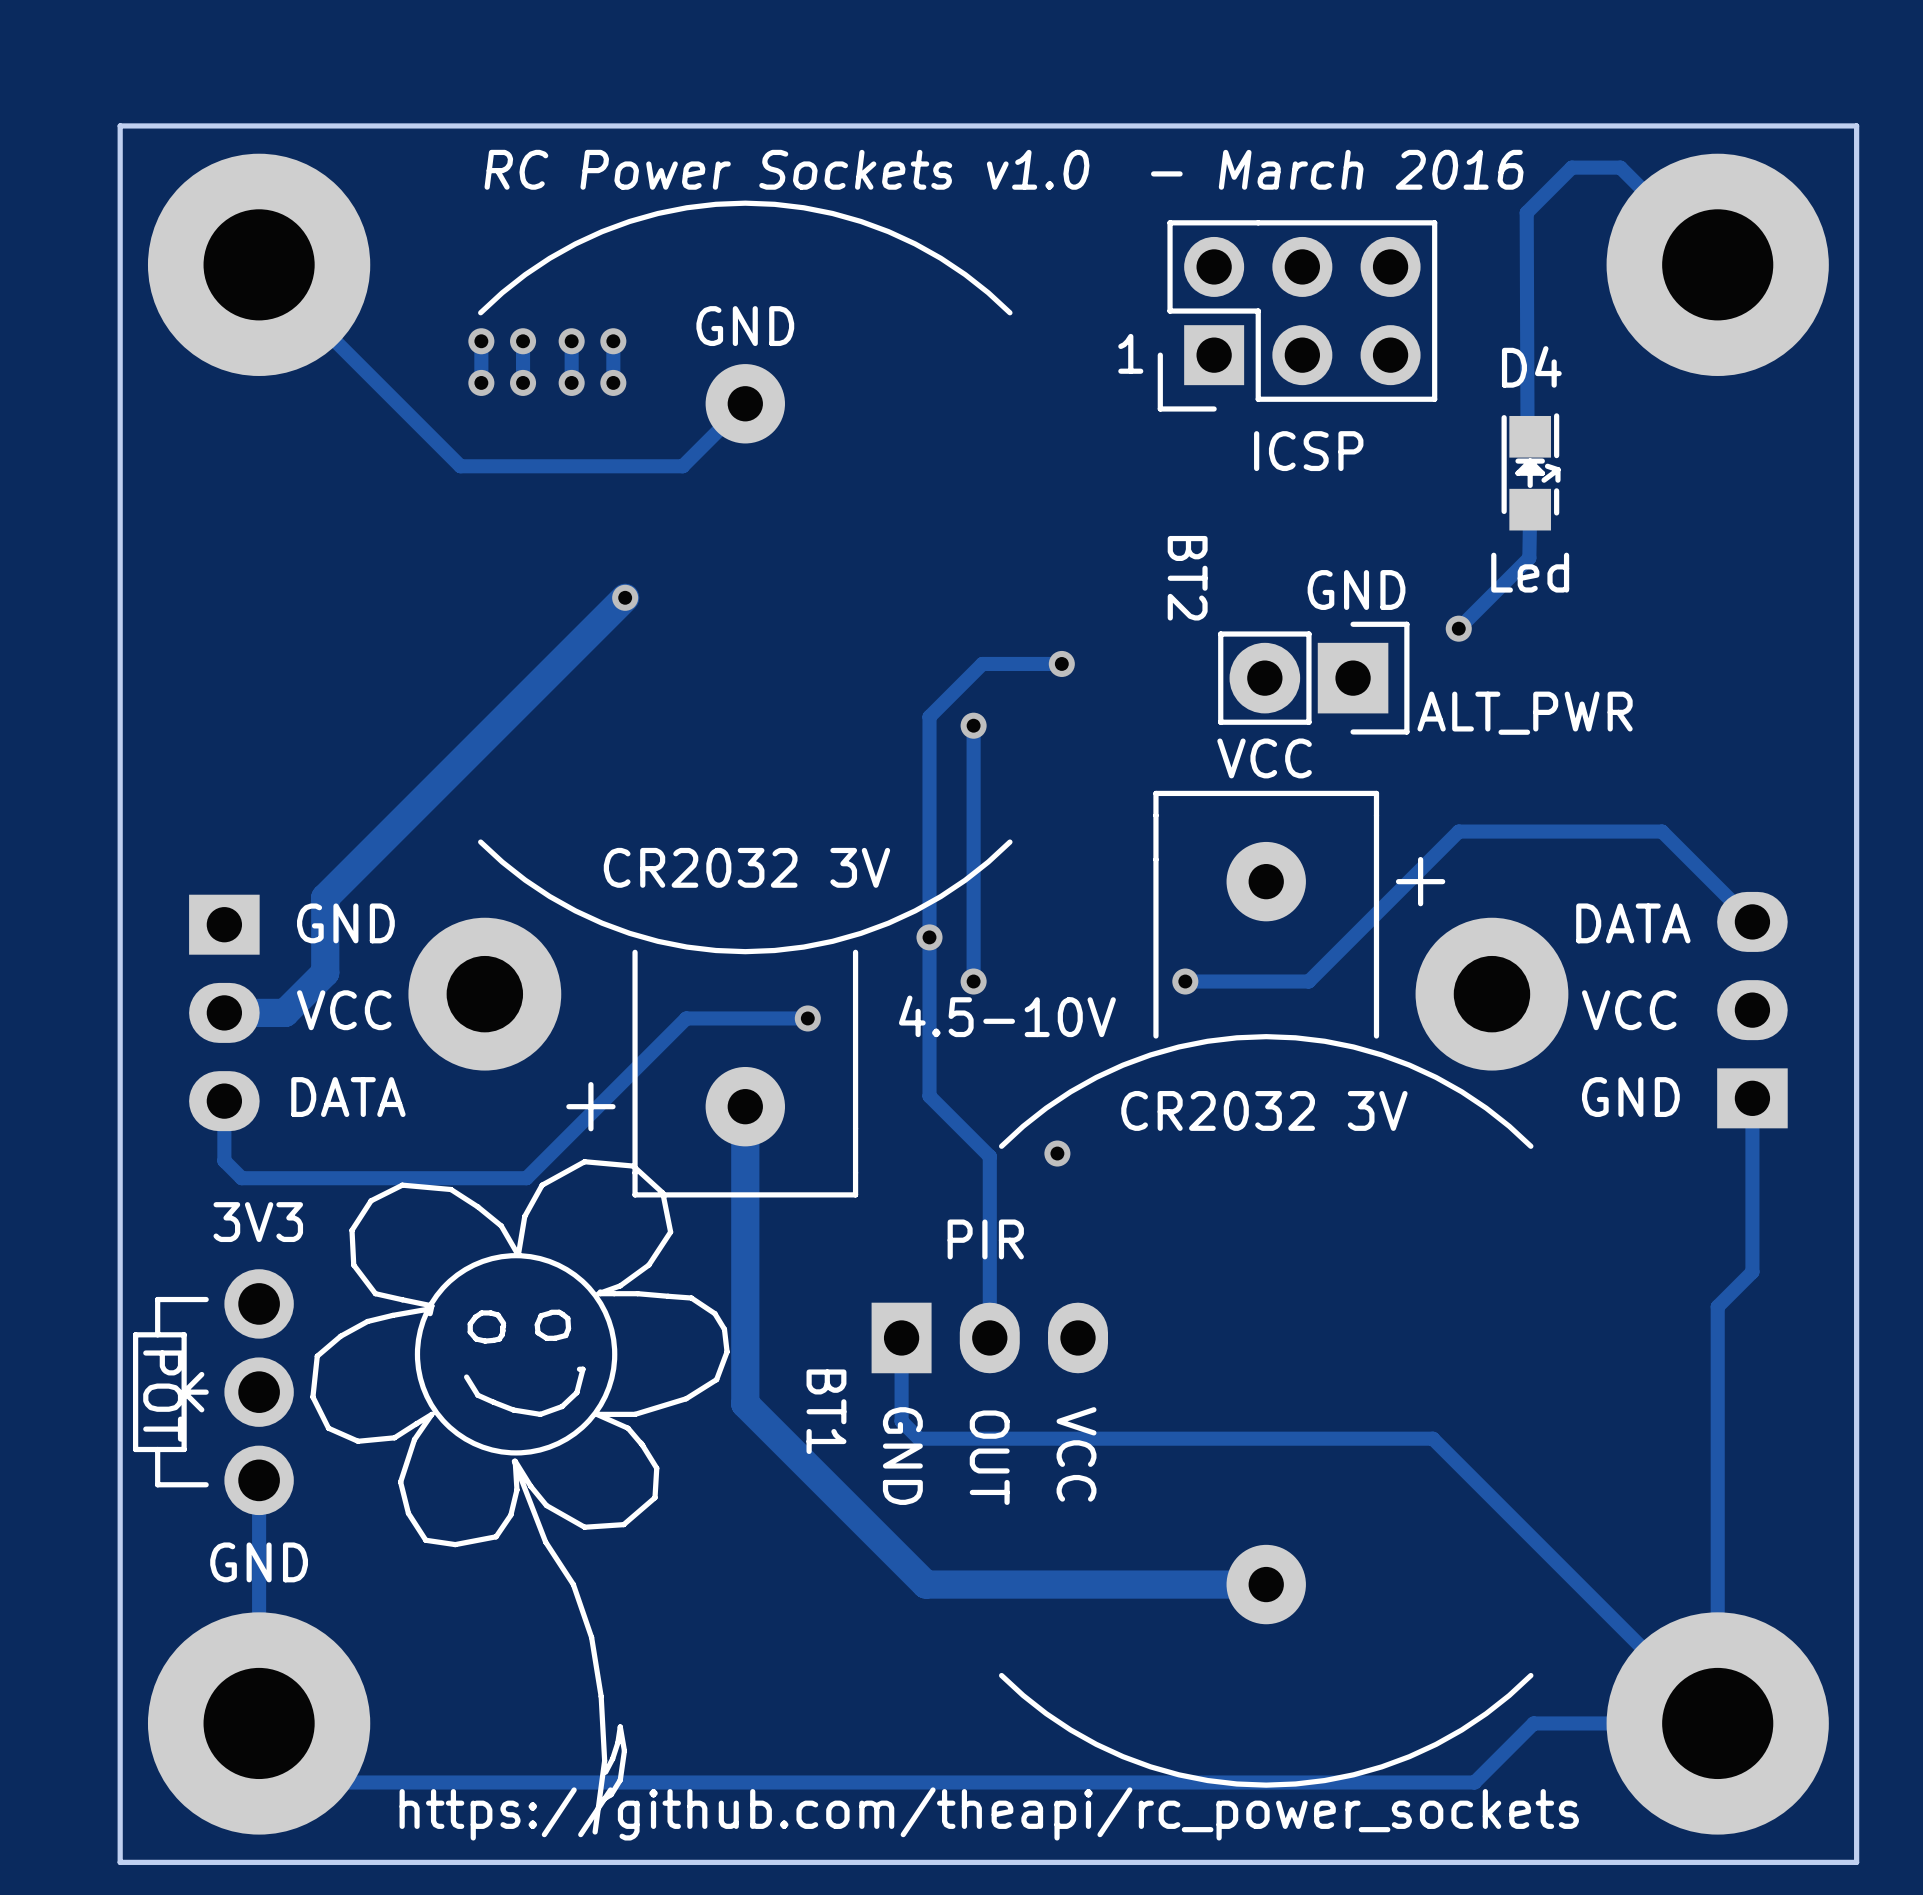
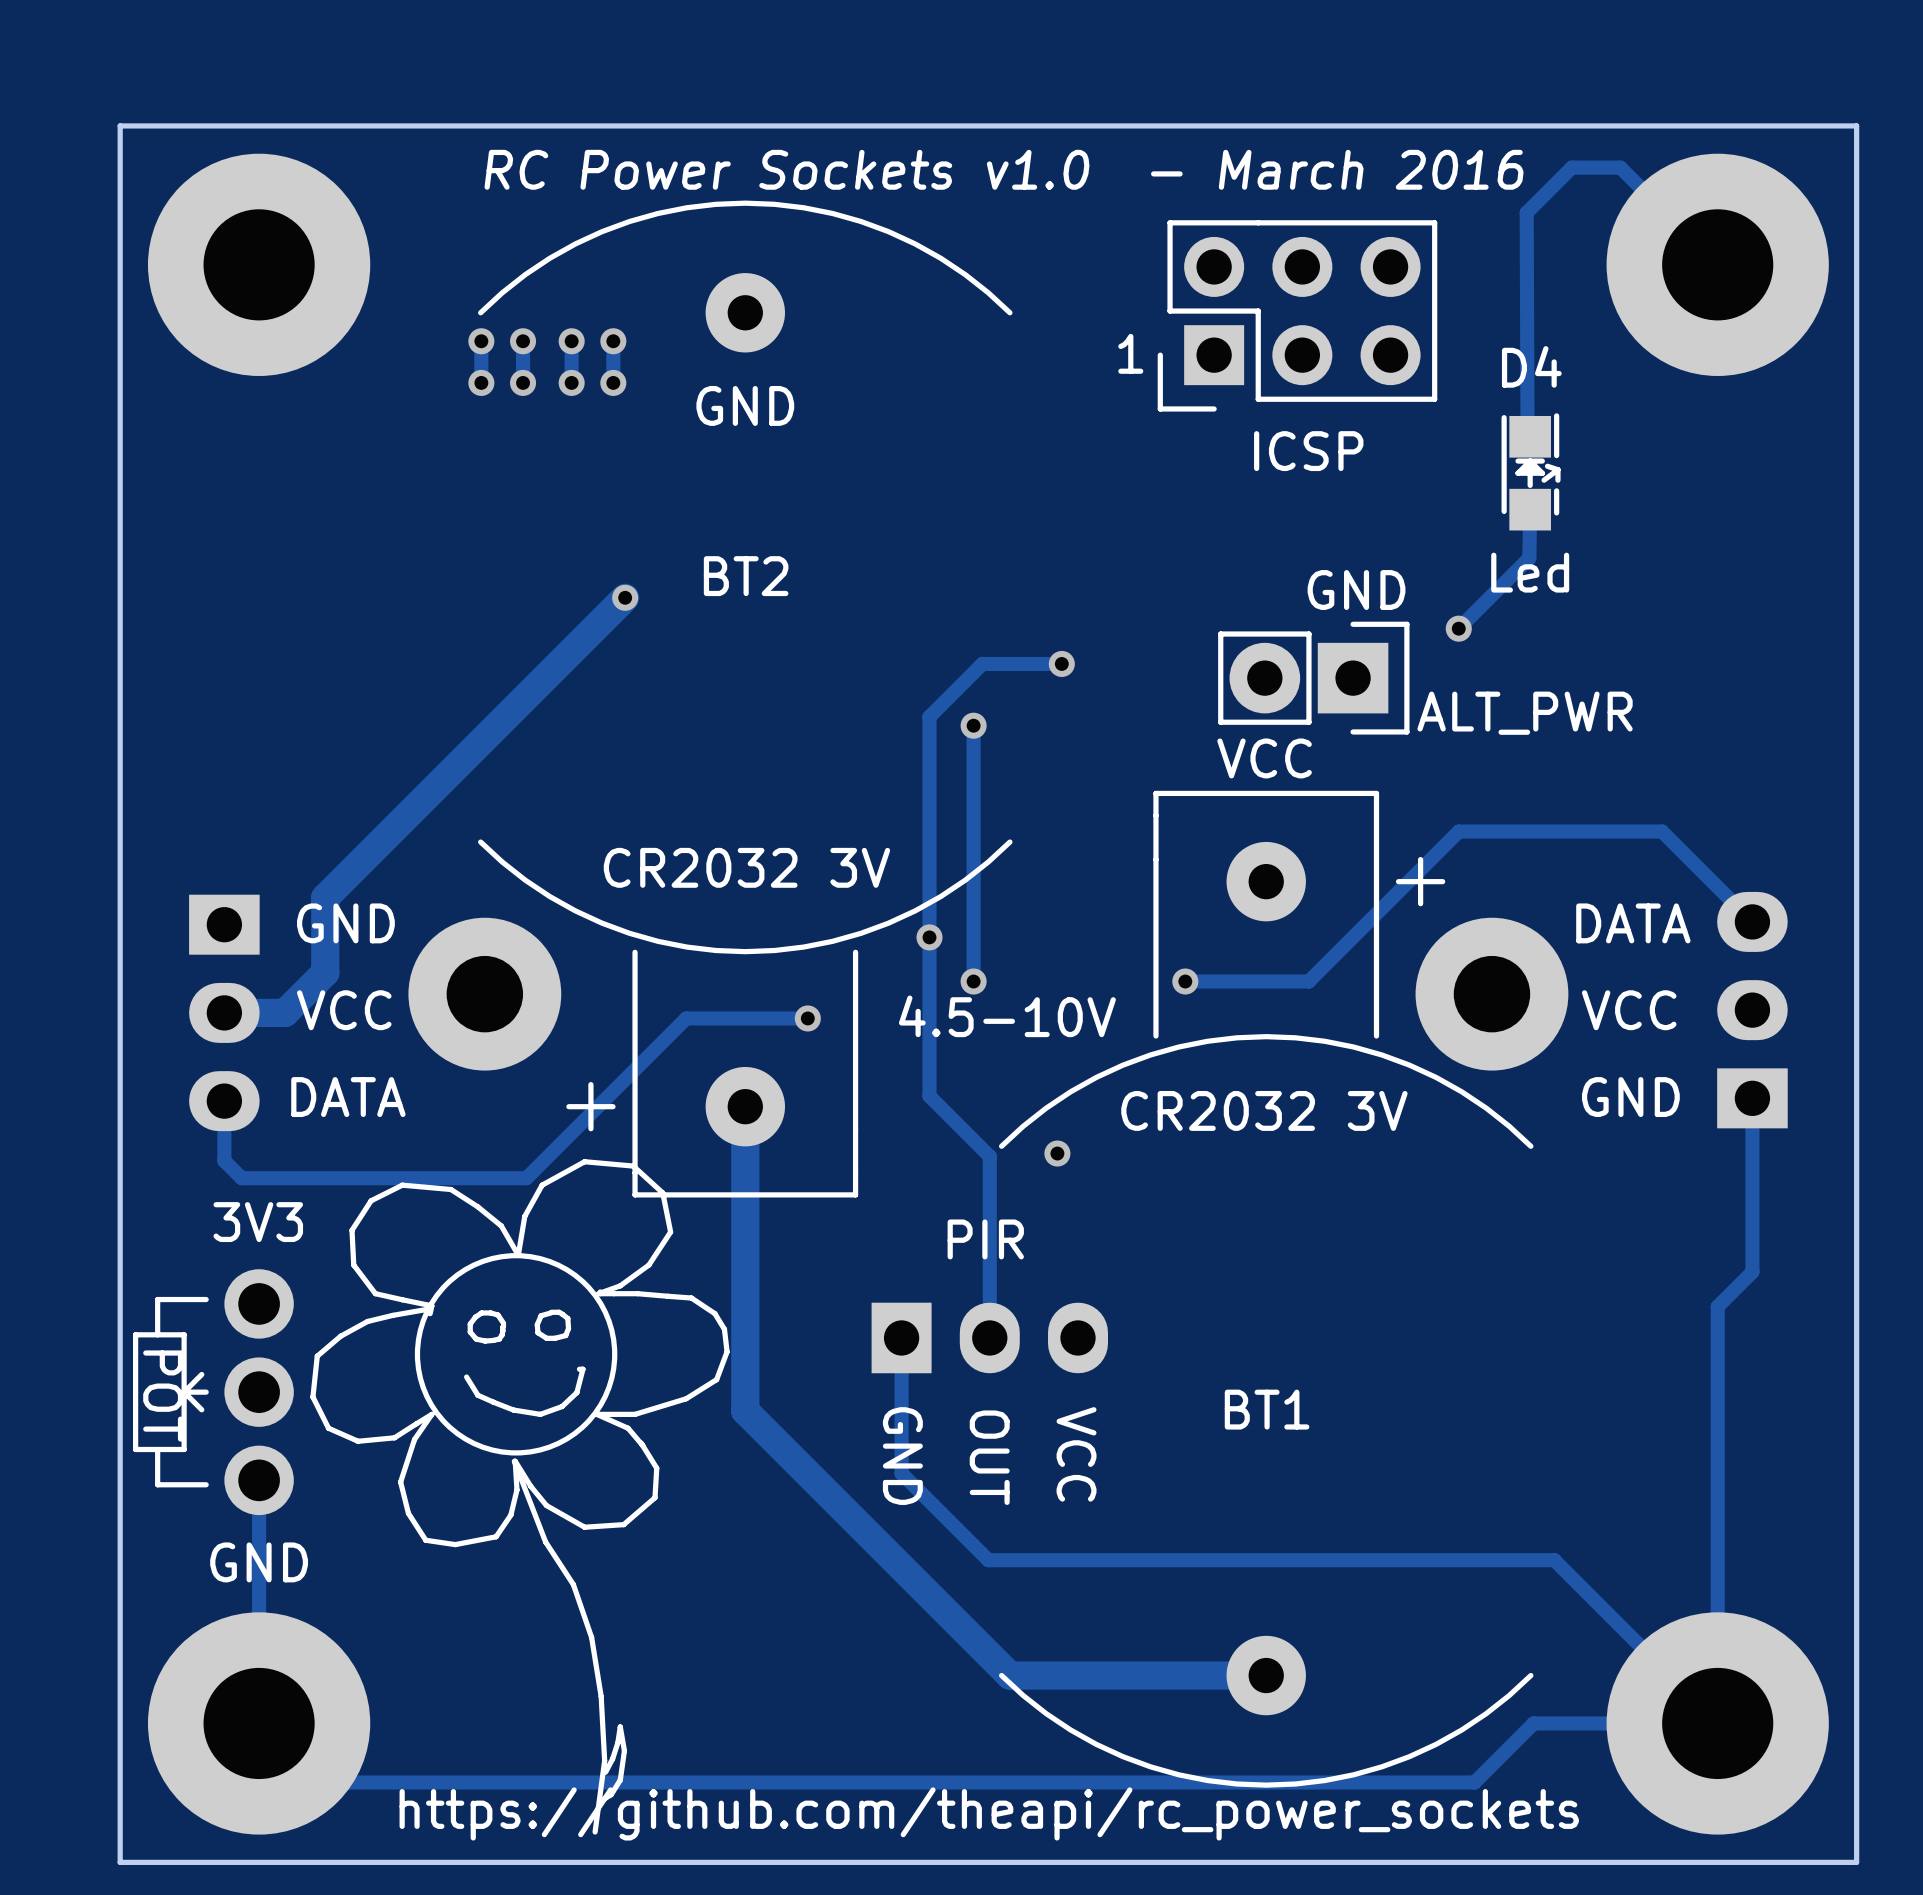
BT2 footprint: [478, 200, 1013, 1198] -> [478, 200, 1013, 1198]
track: (307, 312) (460, 466) (682, 466) (745, 403) -> none
text position: GND (745, 326) -> GND (745, 405)
BT2 name position: BT2 (1187, 578) -> BT2 (746, 576)
BT1 footprint: [998, 790, 1534, 1788] -> [998, 790, 1534, 1788]
track: (745, 1403) (925, 1584) (1266, 1584) -> (745, 1403) (745, 1410) (1009, 1675) (1266, 1675)
BT1 name position: BT1 (826, 1411) -> BT1 (1267, 1409)
track: (901, 1421) (918, 1438) (1432, 1438) (1554, 1560) -> (901, 1421) (901, 1473) (988, 1560) (1554, 1560)

